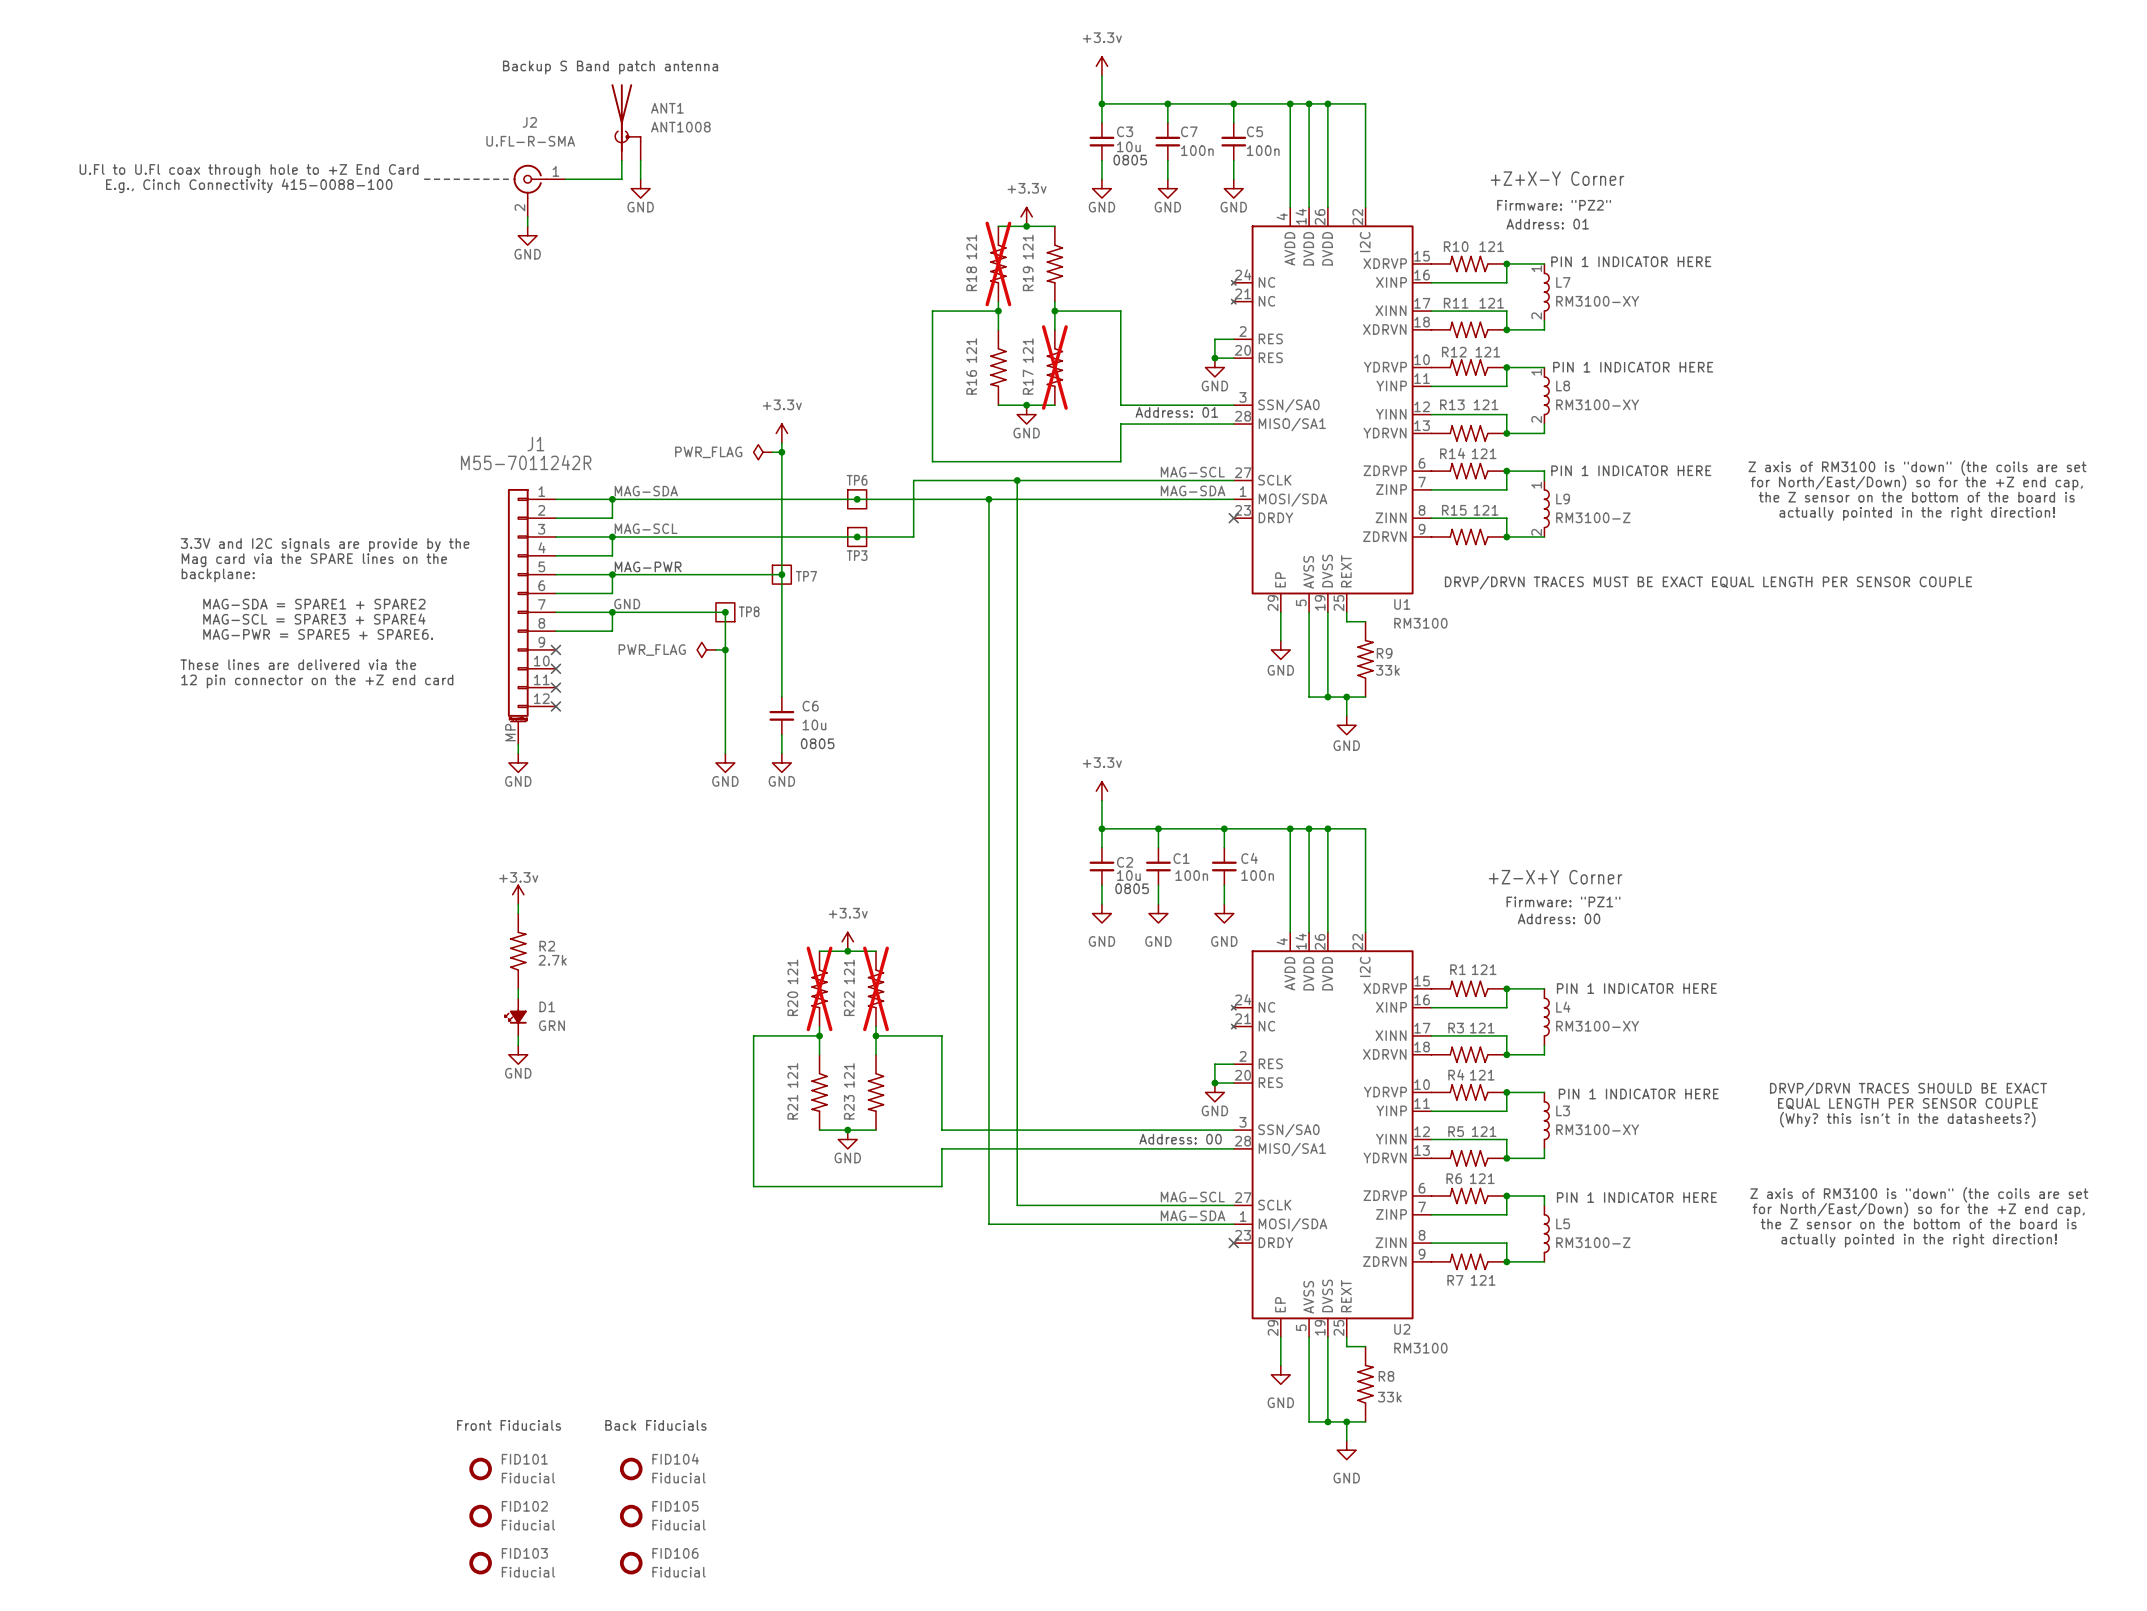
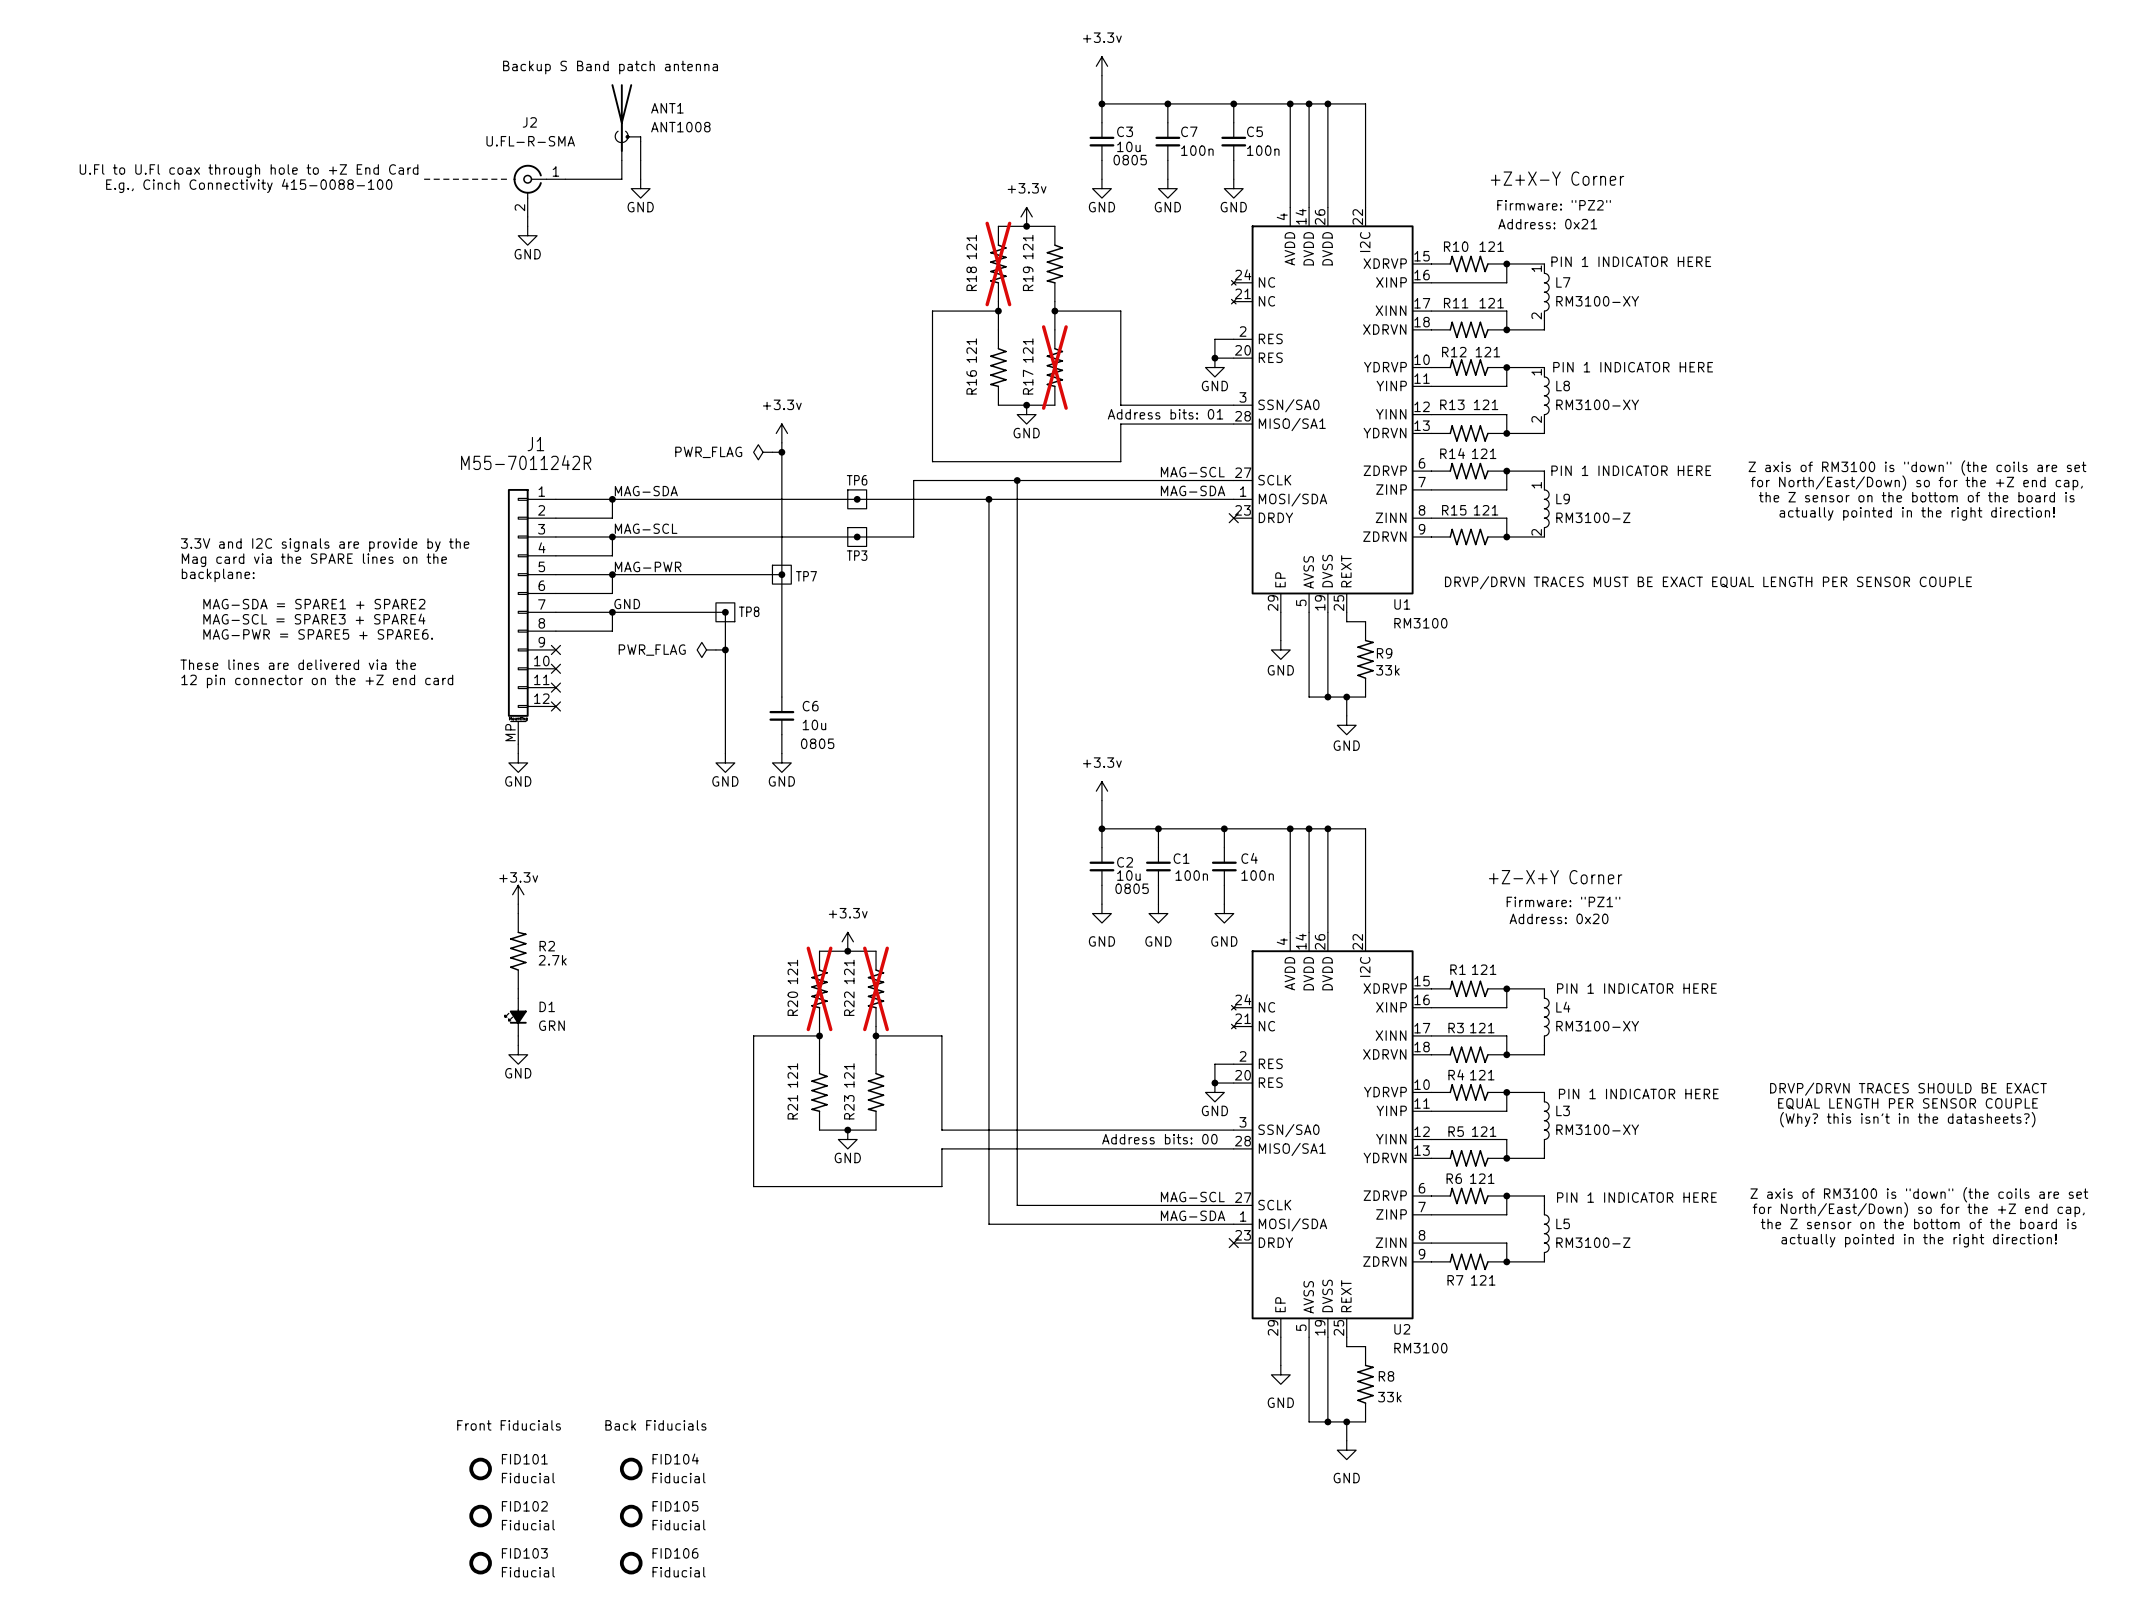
text: Address: 01 (1547, 224) -> Address: 0x21 (1547, 224)
text: Address: 01 (1176, 412) -> Address bits: 01 (1165, 414)
text: Address: 00 (1559, 918) -> Address: 0x20 (1559, 918)
text: Address: 00 (1180, 1139) -> Address bits: 00 (1159, 1139)

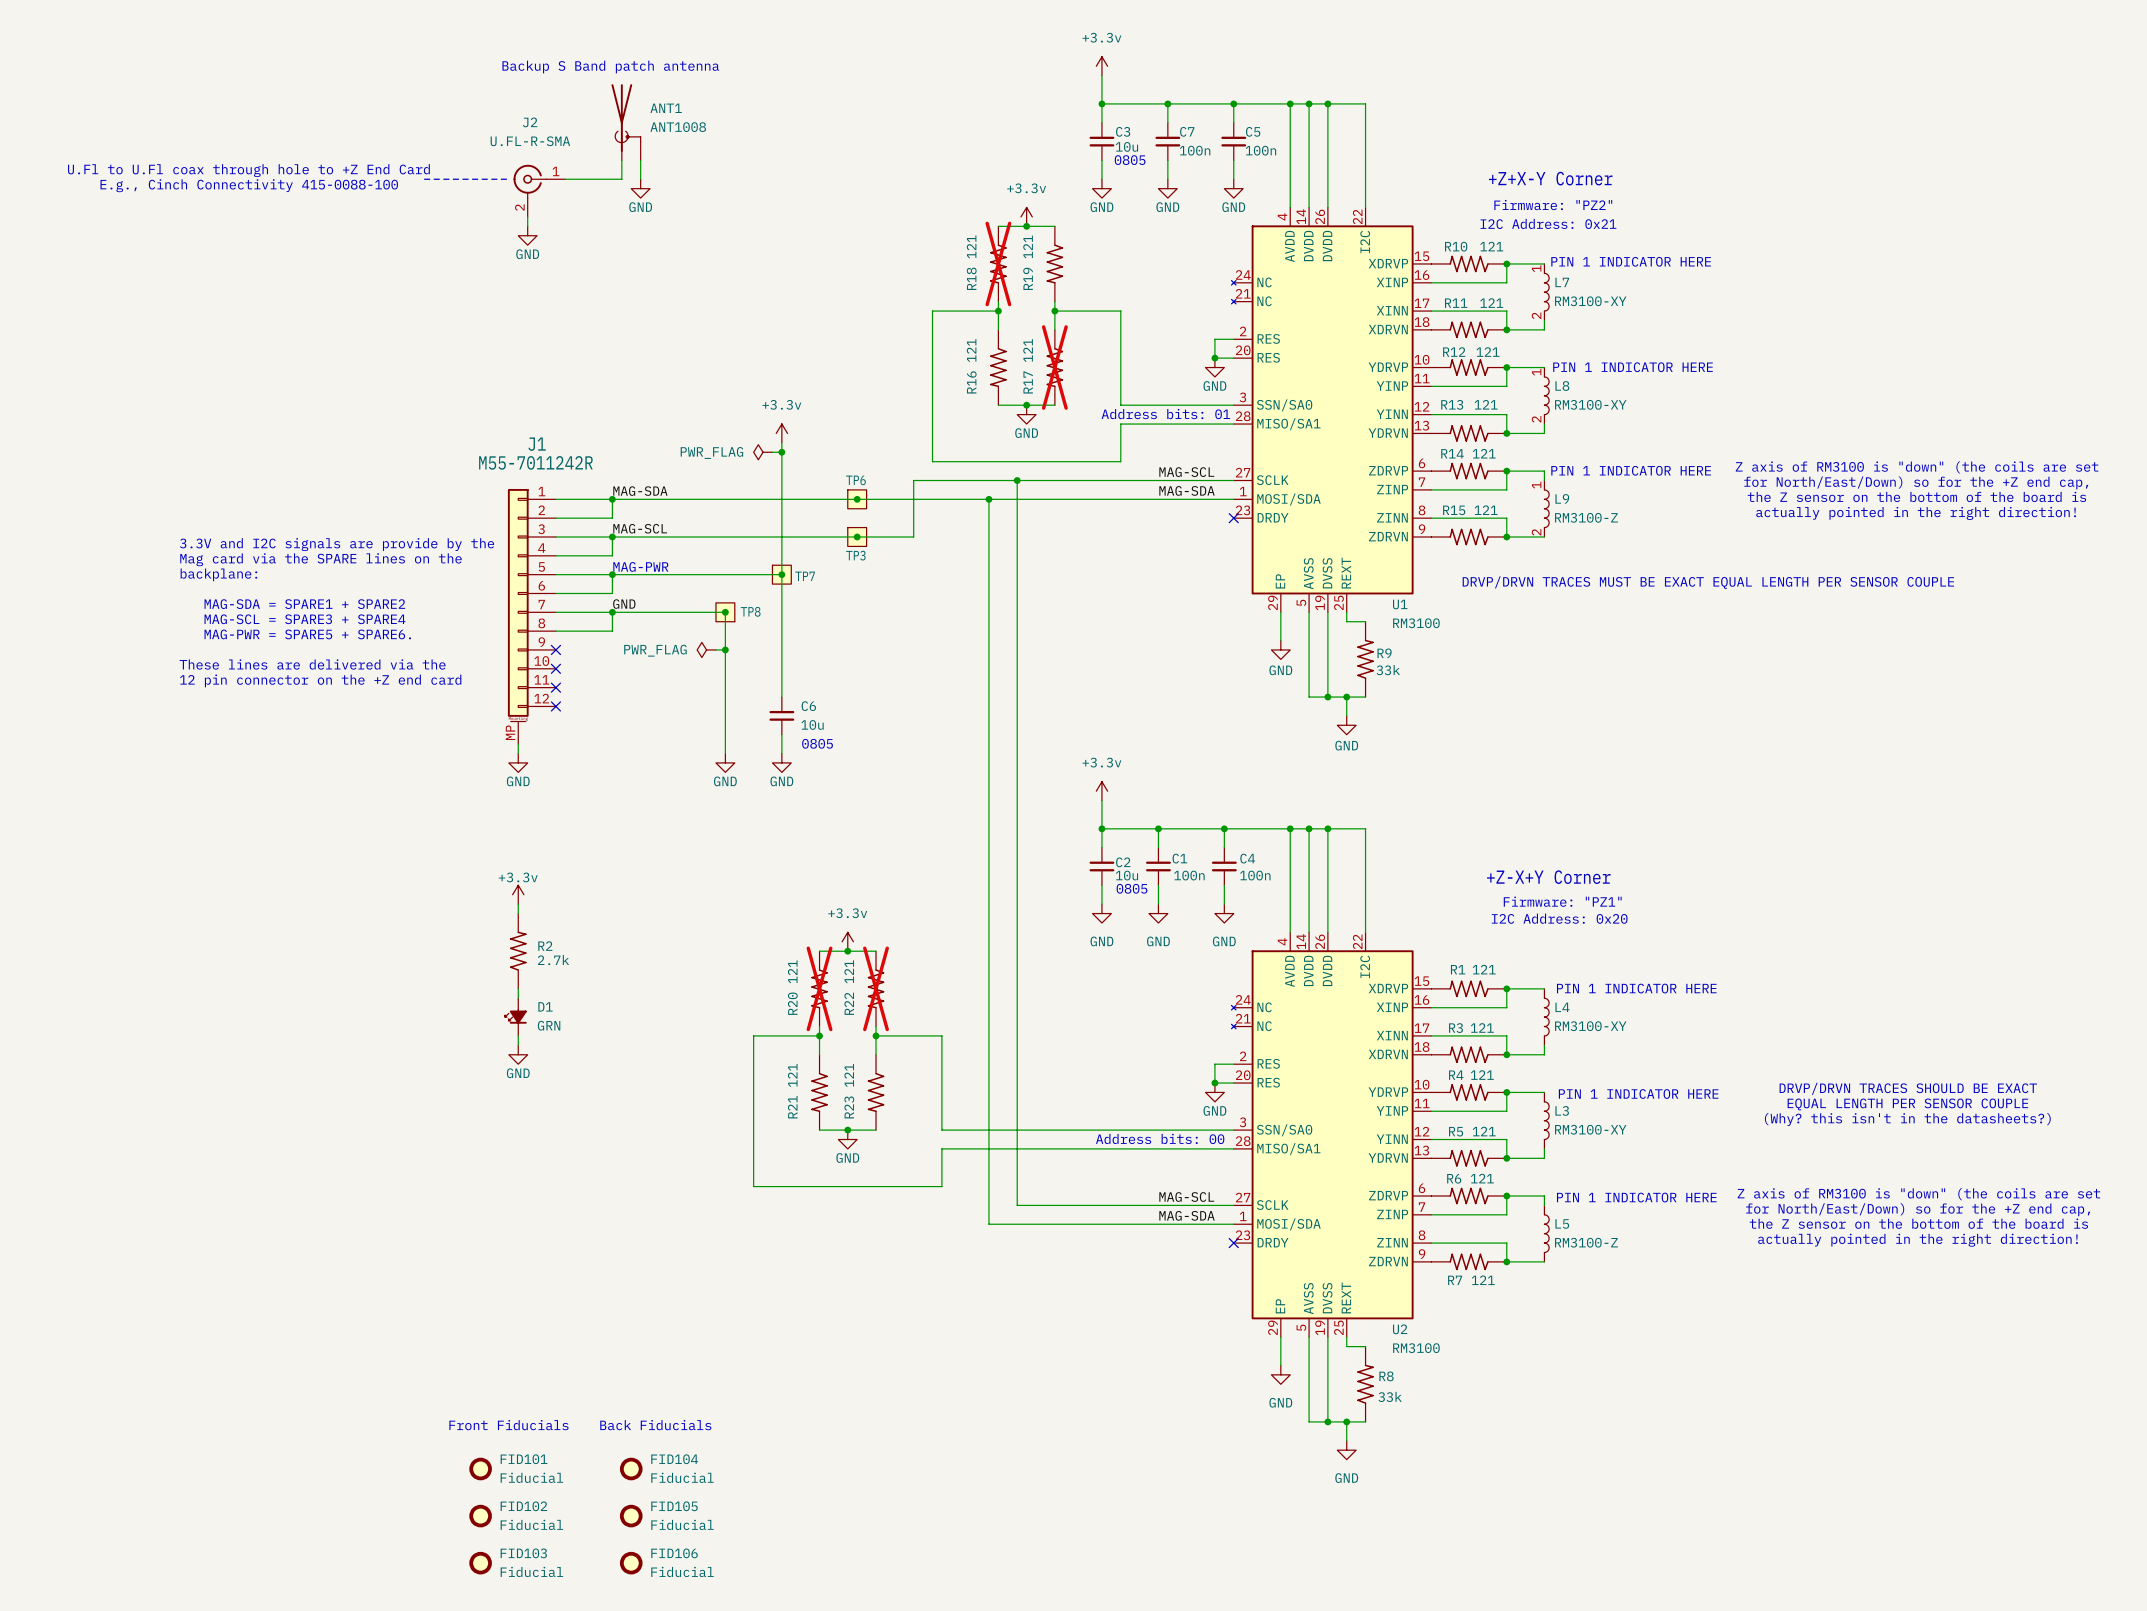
text: Address: 0x21 (1547, 224) -> I2C Address: 0x21 (1548, 223)
text: Address: 0x20 (1559, 918) -> I2C Address: 0x20 (1559, 918)

